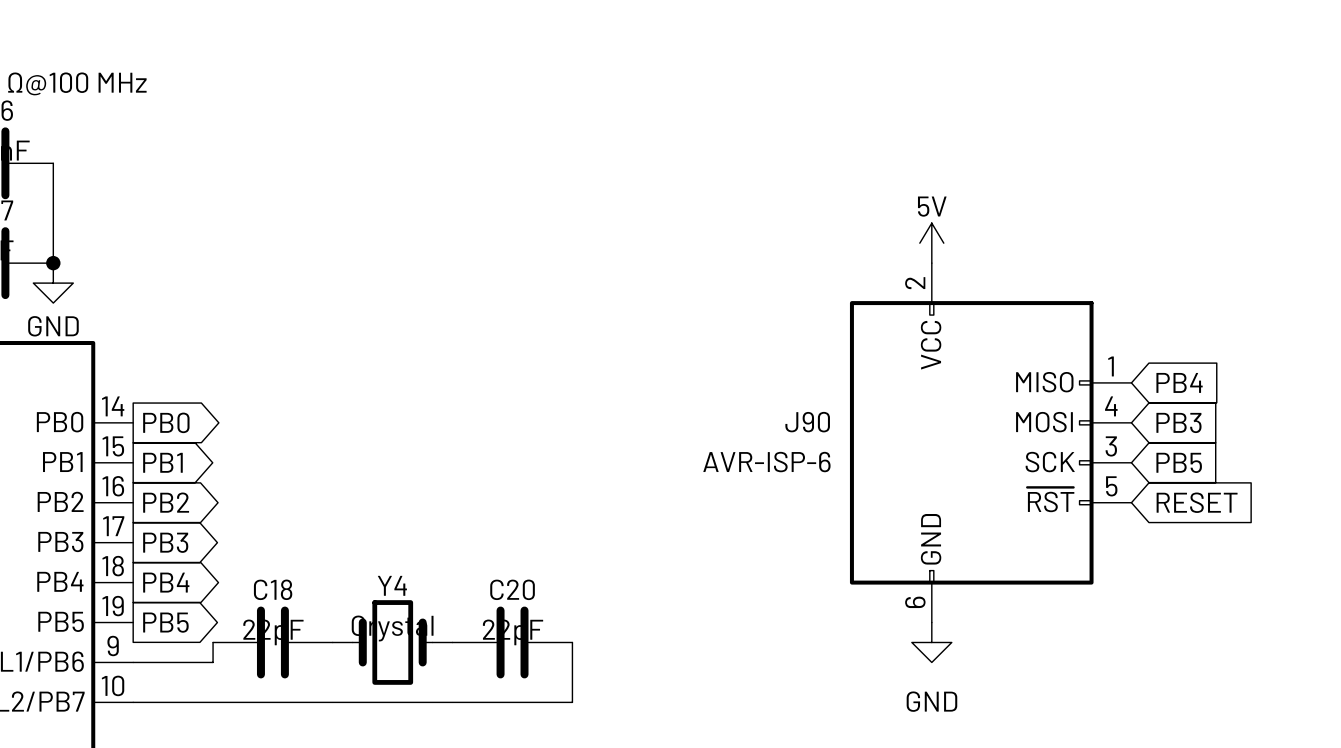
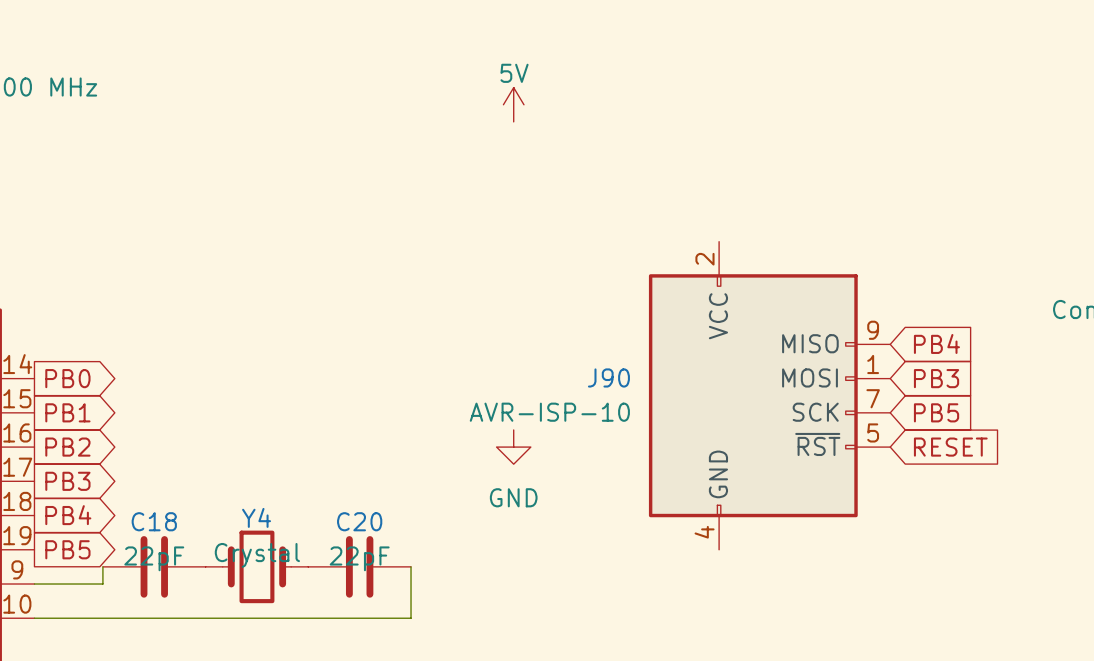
power symbol position: 5V (931, 243) -> 5V (513, 104)
J90 pin number: 1 (1111, 366) -> 9 (873, 330)
J90 pin number: 4 (1111, 406) -> 1 (873, 364)
J90 pin number: 3 (1111, 446) -> 7 (873, 398)
J90 value: AVR-ISP-6 (766, 462) -> AVR-ISP-10 (549, 412)
J90 pin number: 6 (915, 602) -> 4 (704, 532)
power symbol position: GND (931, 642) -> GND (513, 447)

